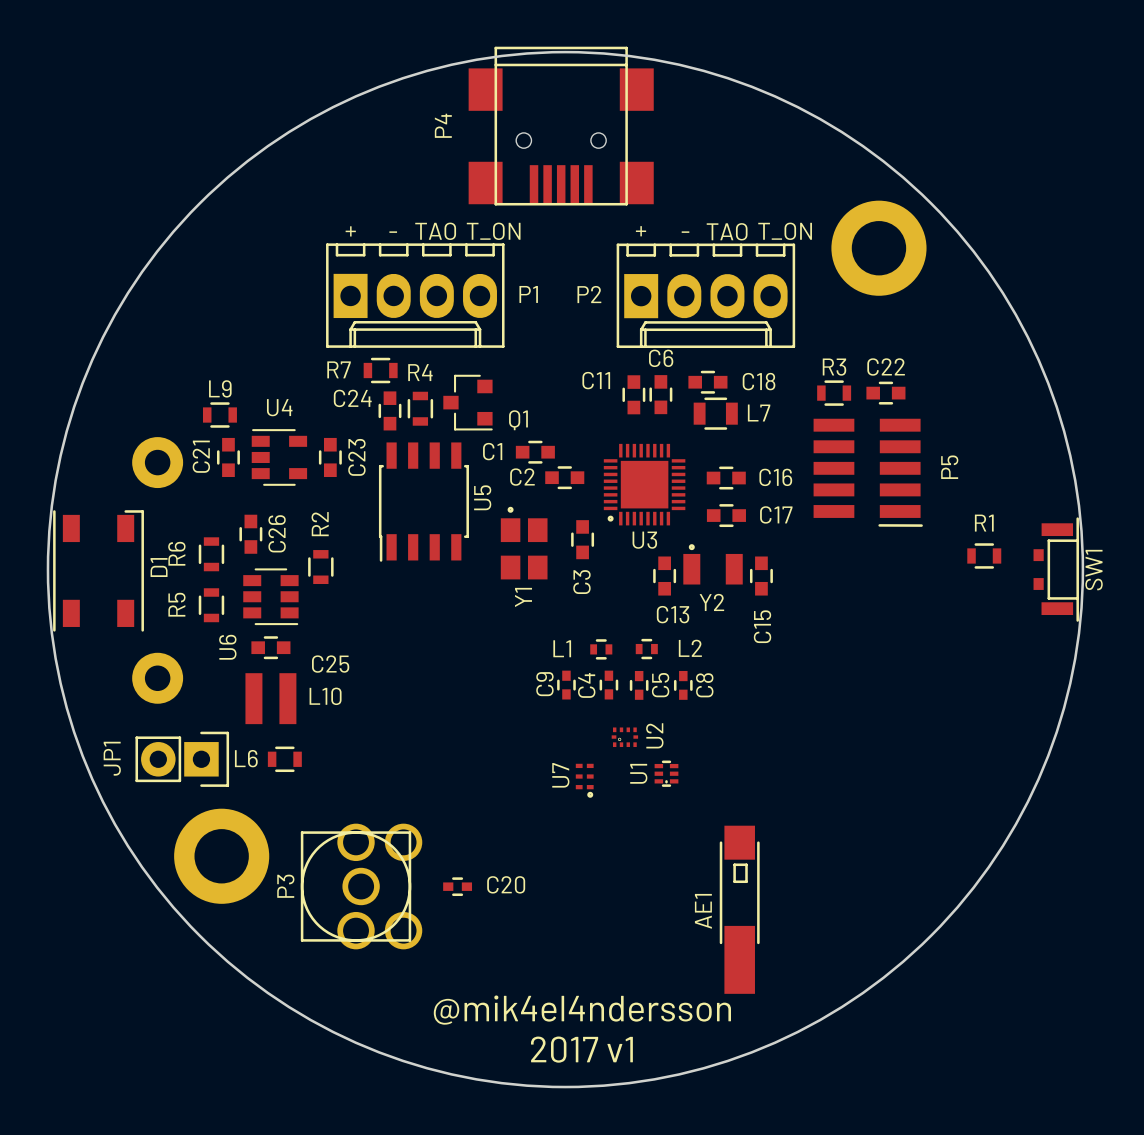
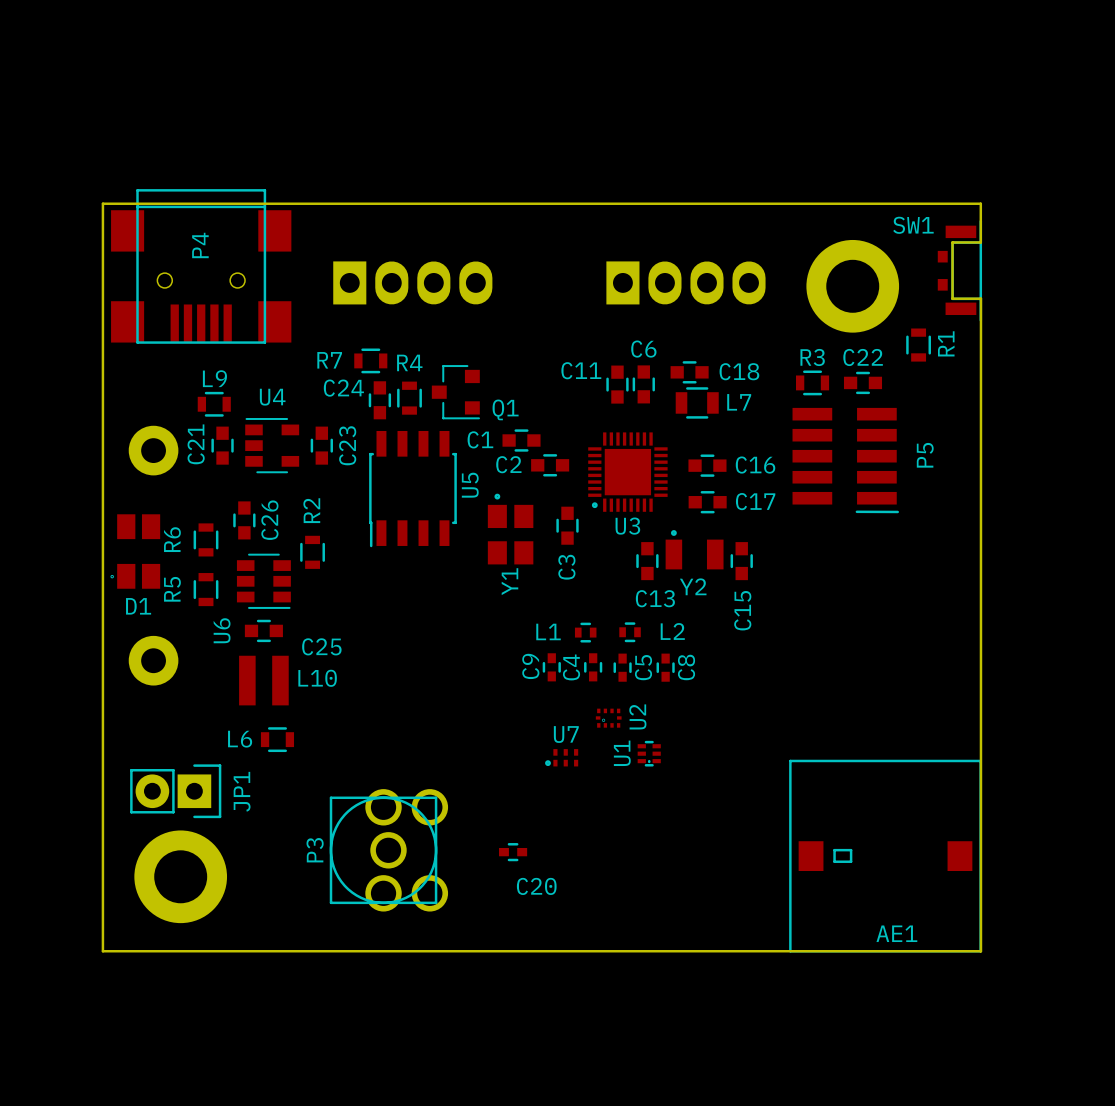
round board edge: [46, 50, 1085, 1089] -> none
P4 name position: P4 (443, 125) -> P4 (200, 245)
P4 position: (561, 126) -> (201, 266)
text: + (350, 231) -> none
text: TAO (435, 231) -> none
text: T_ON (493, 231) -> none
text: + (641, 231) -> none
text: TAO (727, 231) -> none
text: T_ON (785, 231) -> none
text: - (393, 232) -> none
text: - (685, 232) -> none
part position: (878, 248) -> (852, 286)
P1 side: top (415, 295) -> bottom (412, 282)
P2 side: top (705, 295) -> bottom (685, 282)
D1 footprint: [53, 510, 144, 632] -> [110, 514, 161, 589]
R1 rotation: 0° (984, 555) -> 90° clockwise (918, 345)
R1 position: (984, 555) -> (918, 345)
D1 name position: D1 (159, 567) -> D1 (138, 606)
SW1 position: (1056, 569) -> (959, 270)
SW1 name rotation: 0° (1094, 570) -> 90° clockwise (913, 225)
SW1 name position: SW1 (1094, 570) -> SW1 (913, 225)
JP1 name position: JP1 (112, 758) -> JP1 (242, 791)
JP1 position: (182, 759) -> (175, 791)
U7 rotation: 0° (584, 780) -> 90° clockwise (561, 757)
AE1 footprint: [719, 825, 760, 994] -> [789, 759, 982, 953]
part position: (221, 856) -> (180, 876)
C20 name position: C20 (506, 884) -> C20 (536, 886)
P3 position: (361, 886) -> (388, 850)
C20 position: (457, 886) -> (513, 852)
AE1 name position: AE1 (703, 911) -> AE1 (896, 933)
board edge: none -> (980, 951) (102, 951) (102, 203) (980, 203) (980, 242) (952, 242) (952, 298) (980, 298) (980, 951)
text: @mik4el4ndersson (582, 1010) -> none
text: 2017 v1 (581, 1049) -> none

